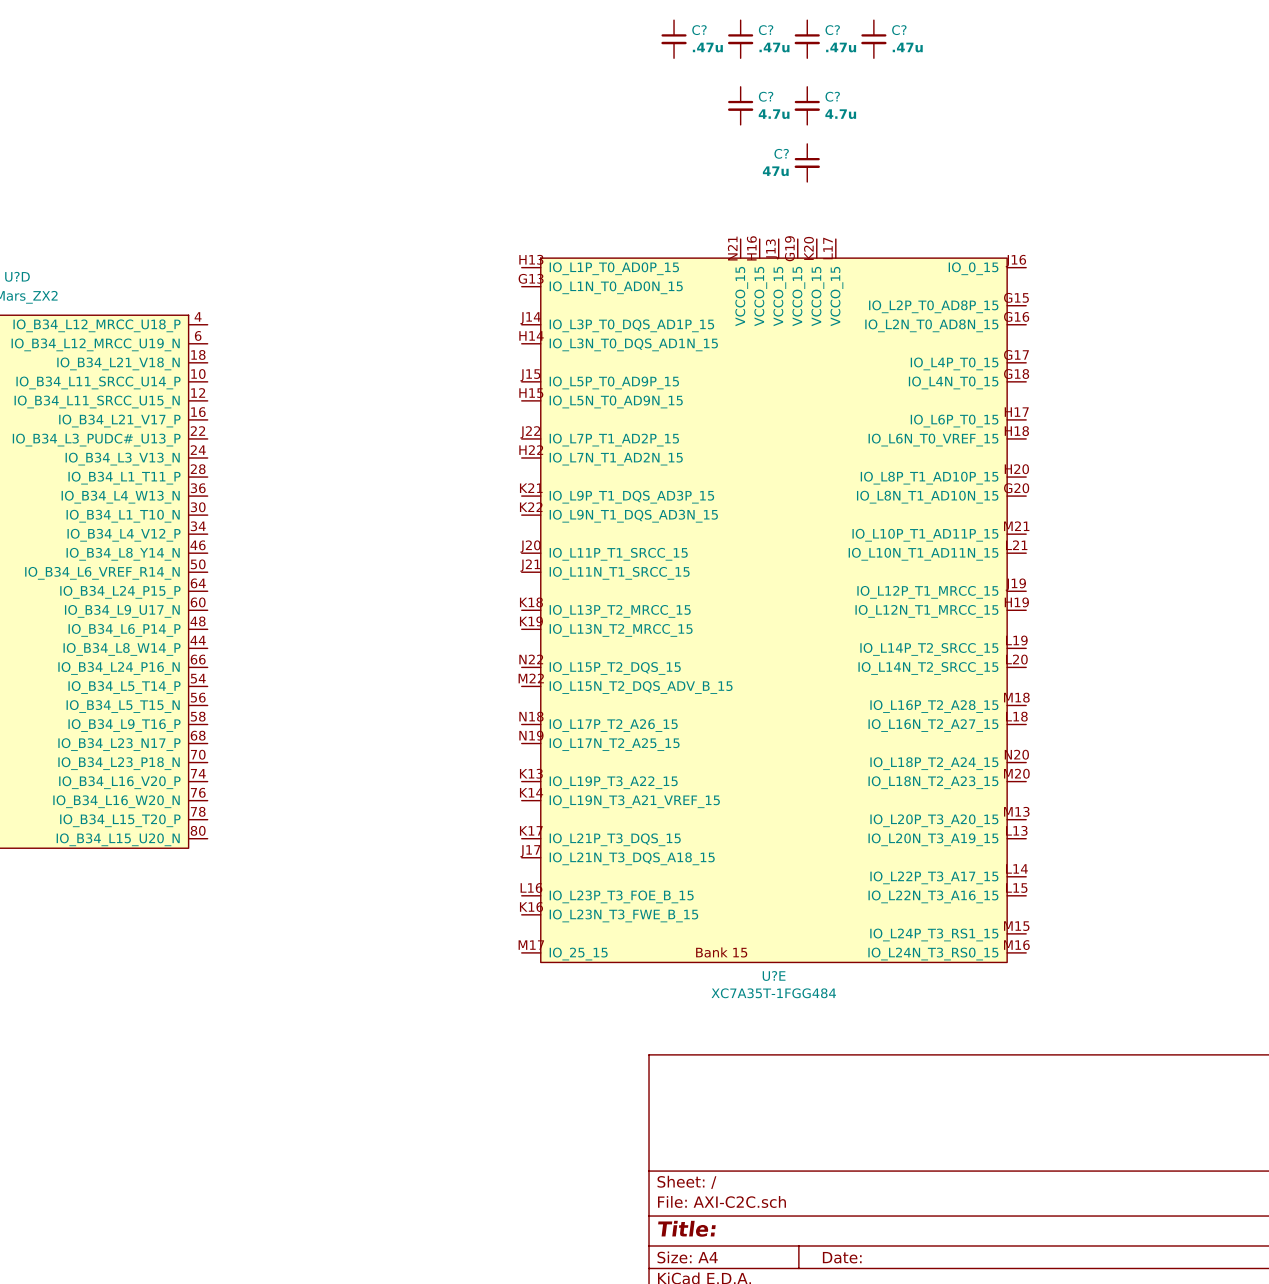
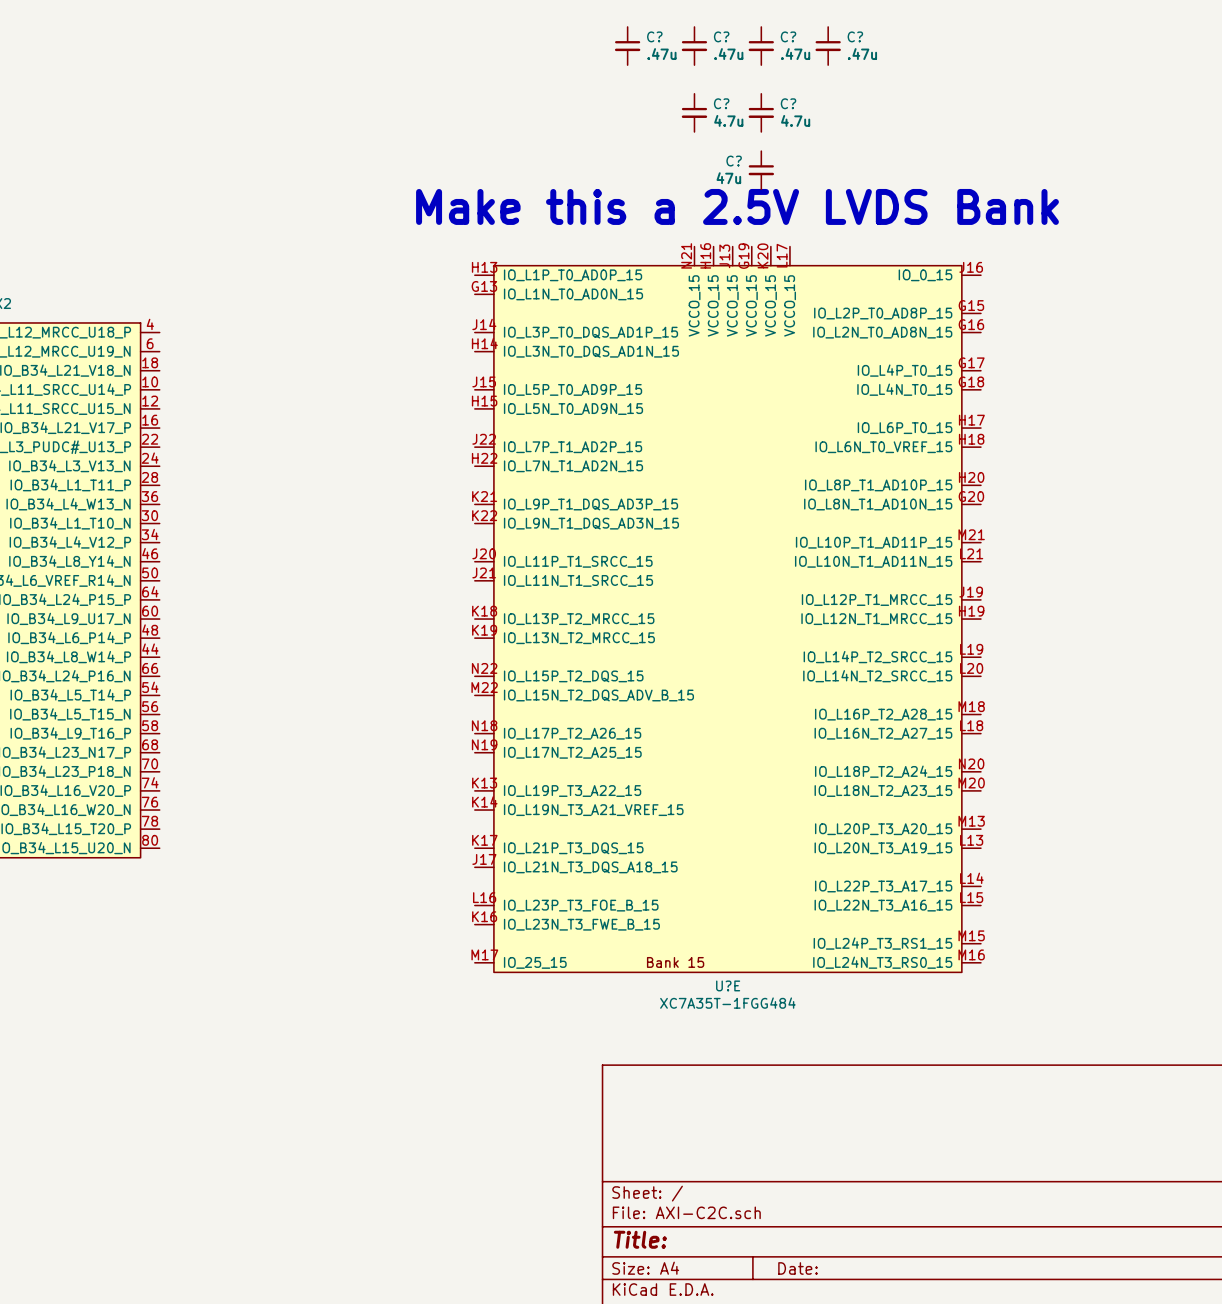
text: none -> Make this a 2.5V LVDS Bank (737, 206)

